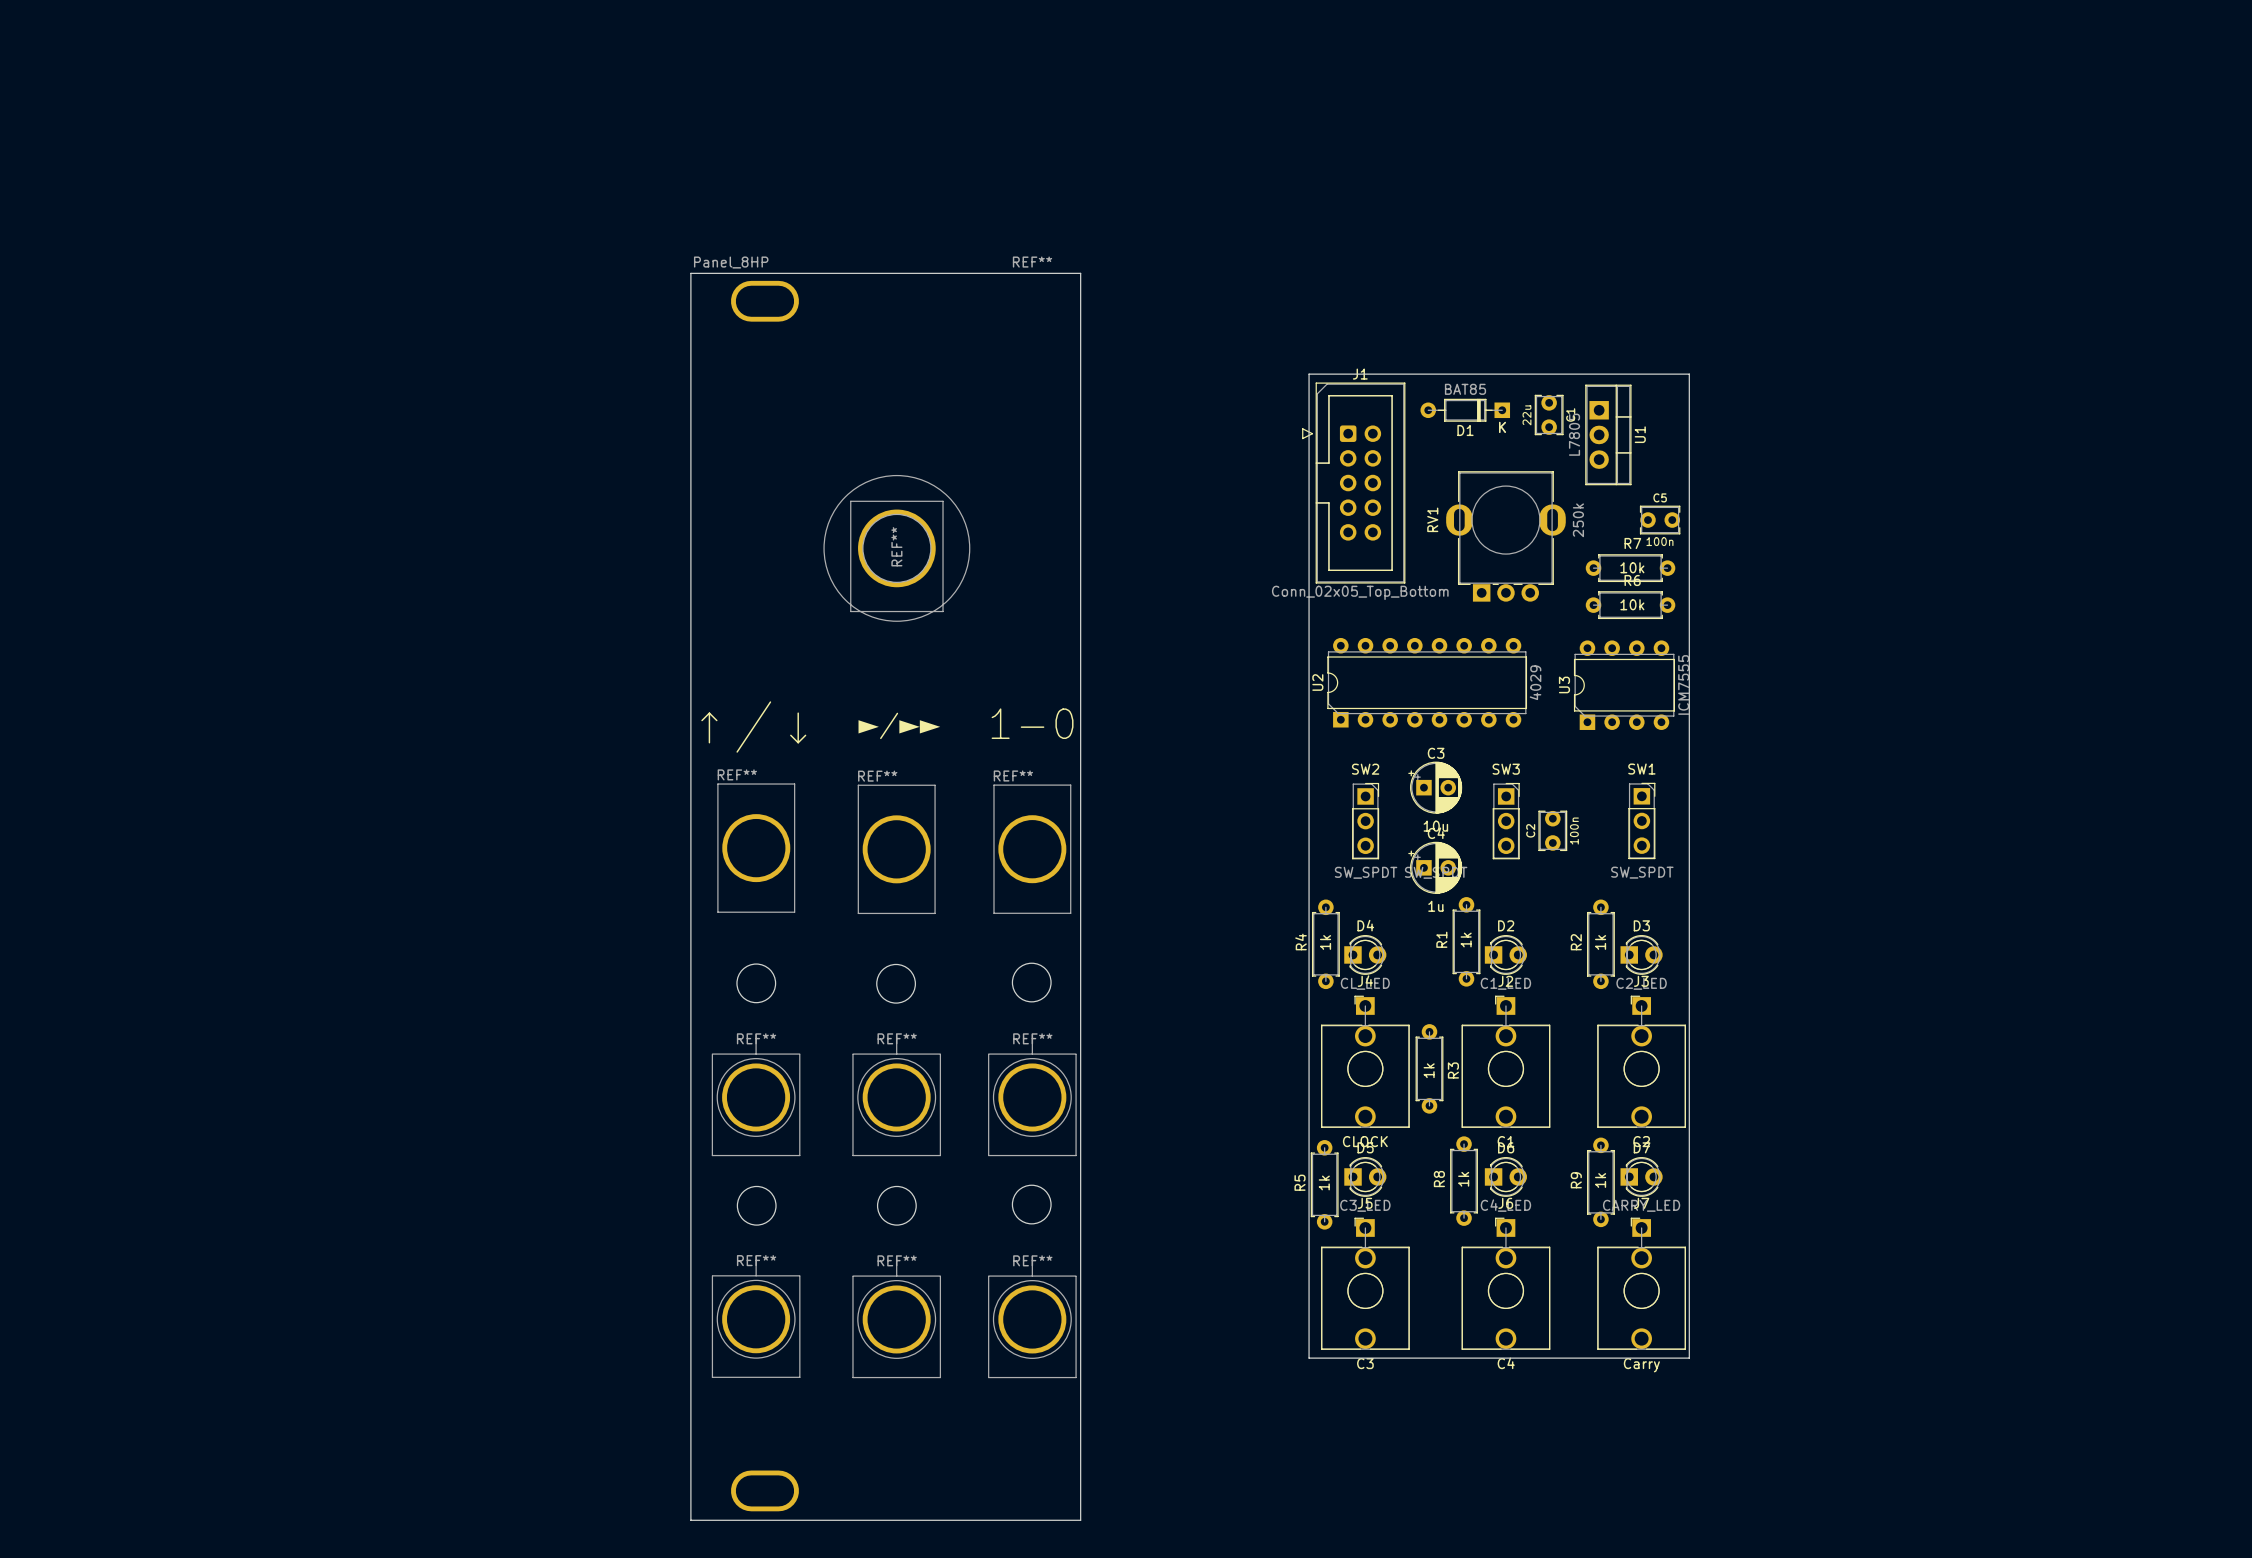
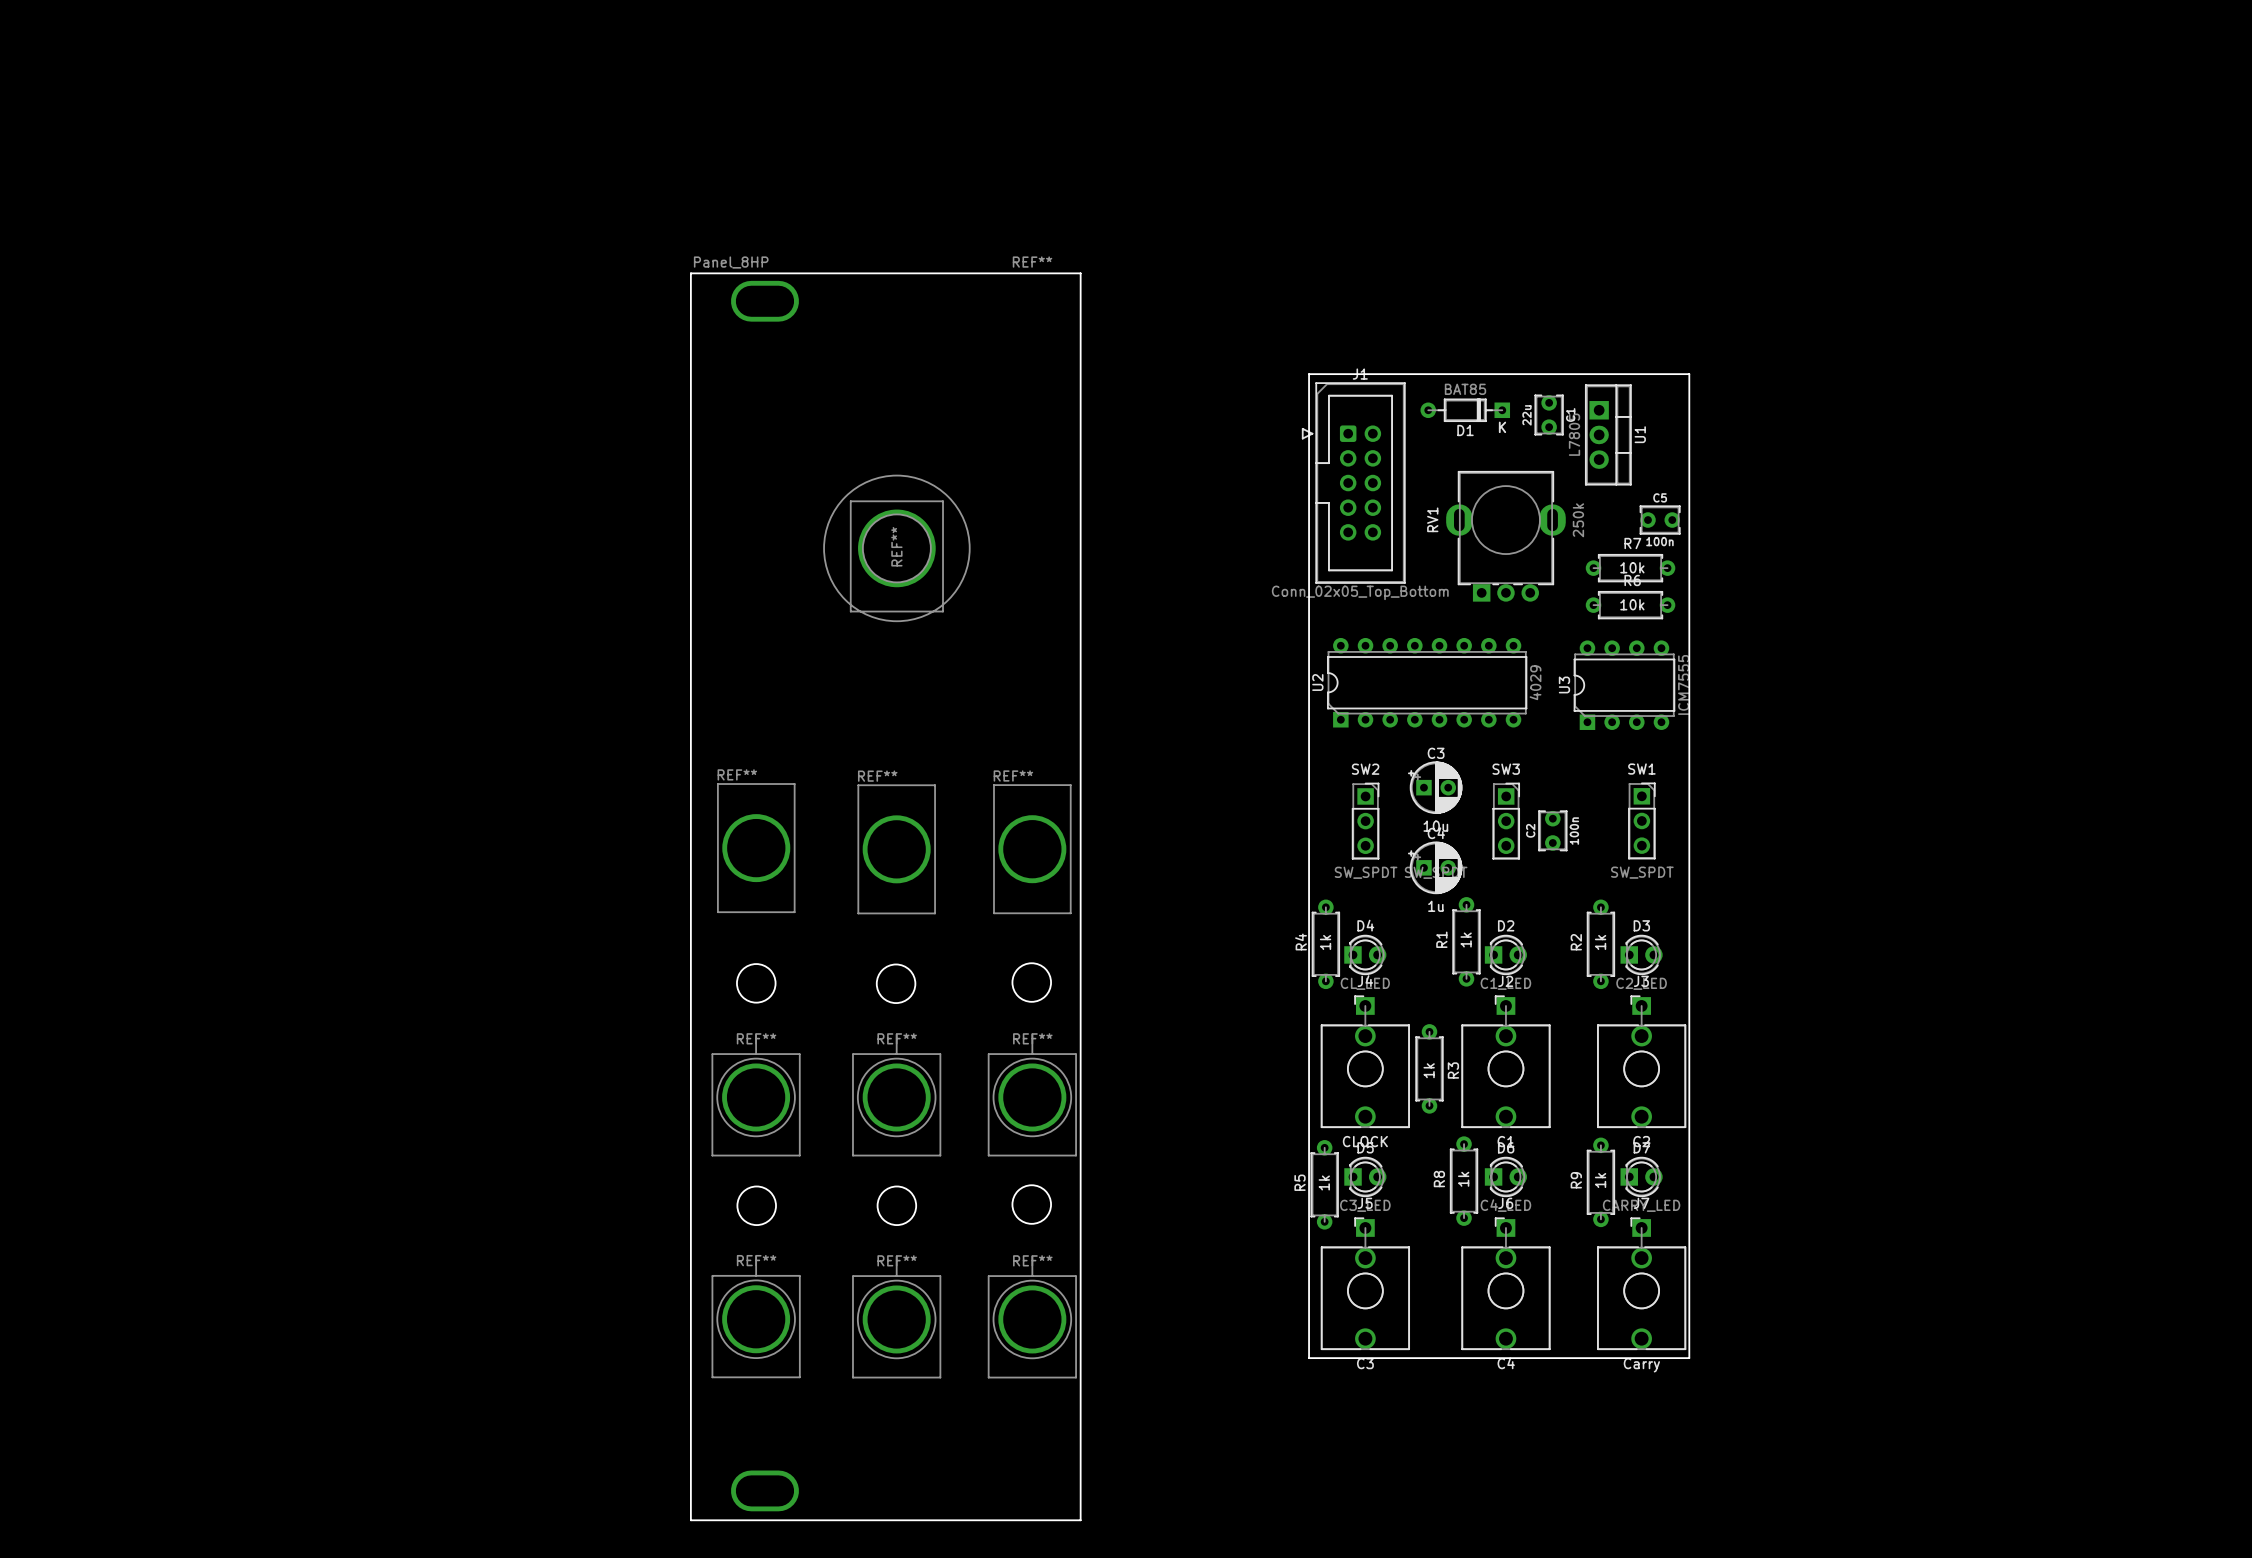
text: 1-0 (1032, 723) -> none
text: ►/►► (899, 725) -> none
text: ↑/↓ (753, 727) -> none

